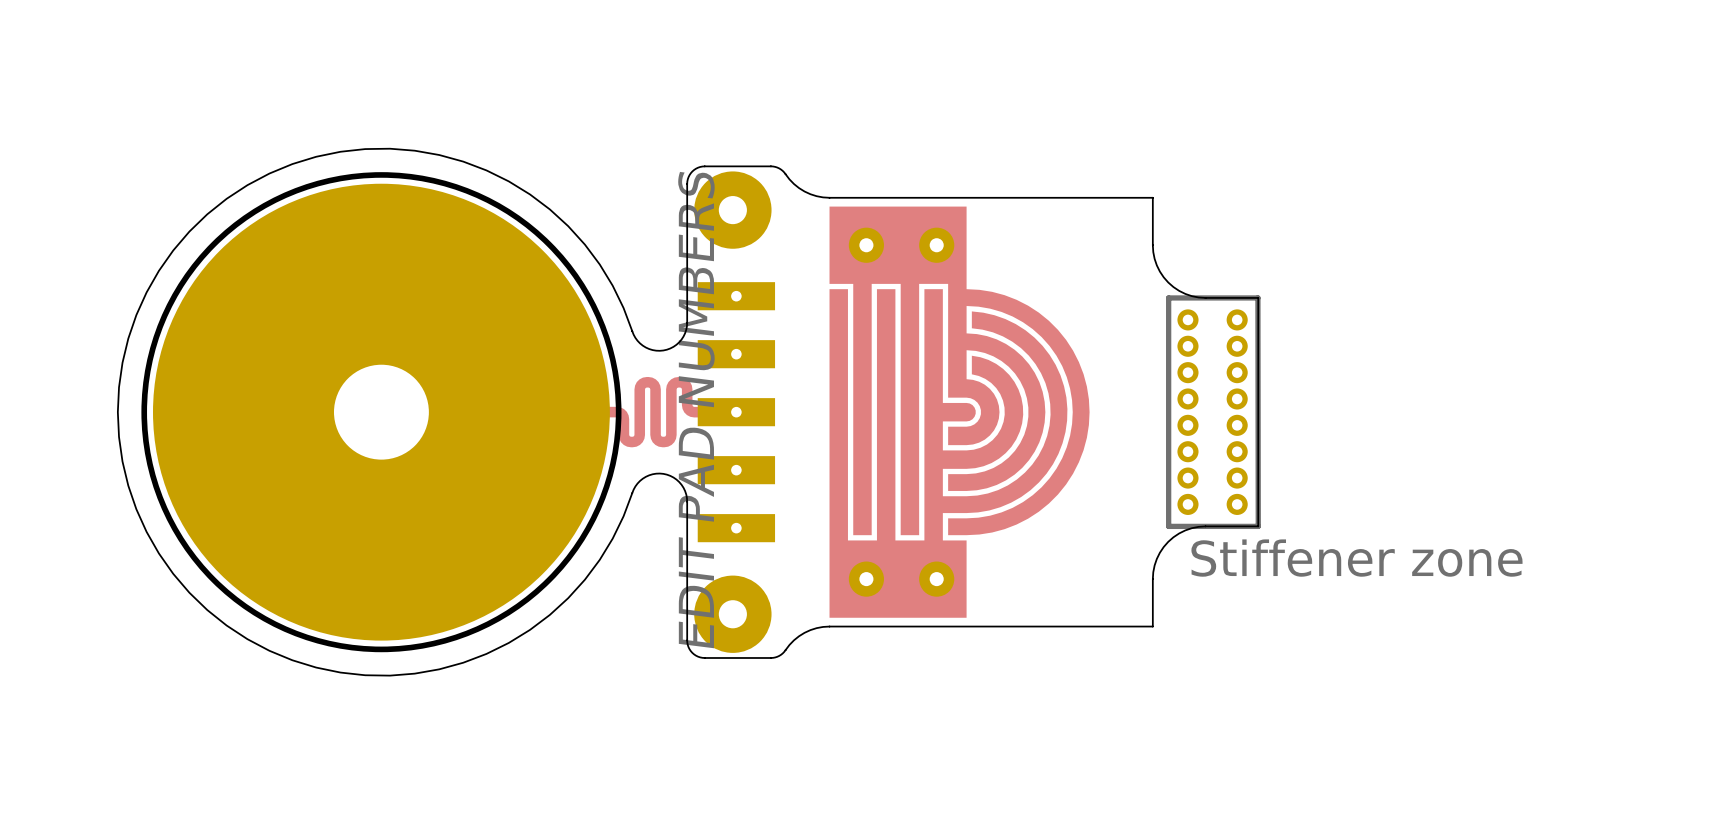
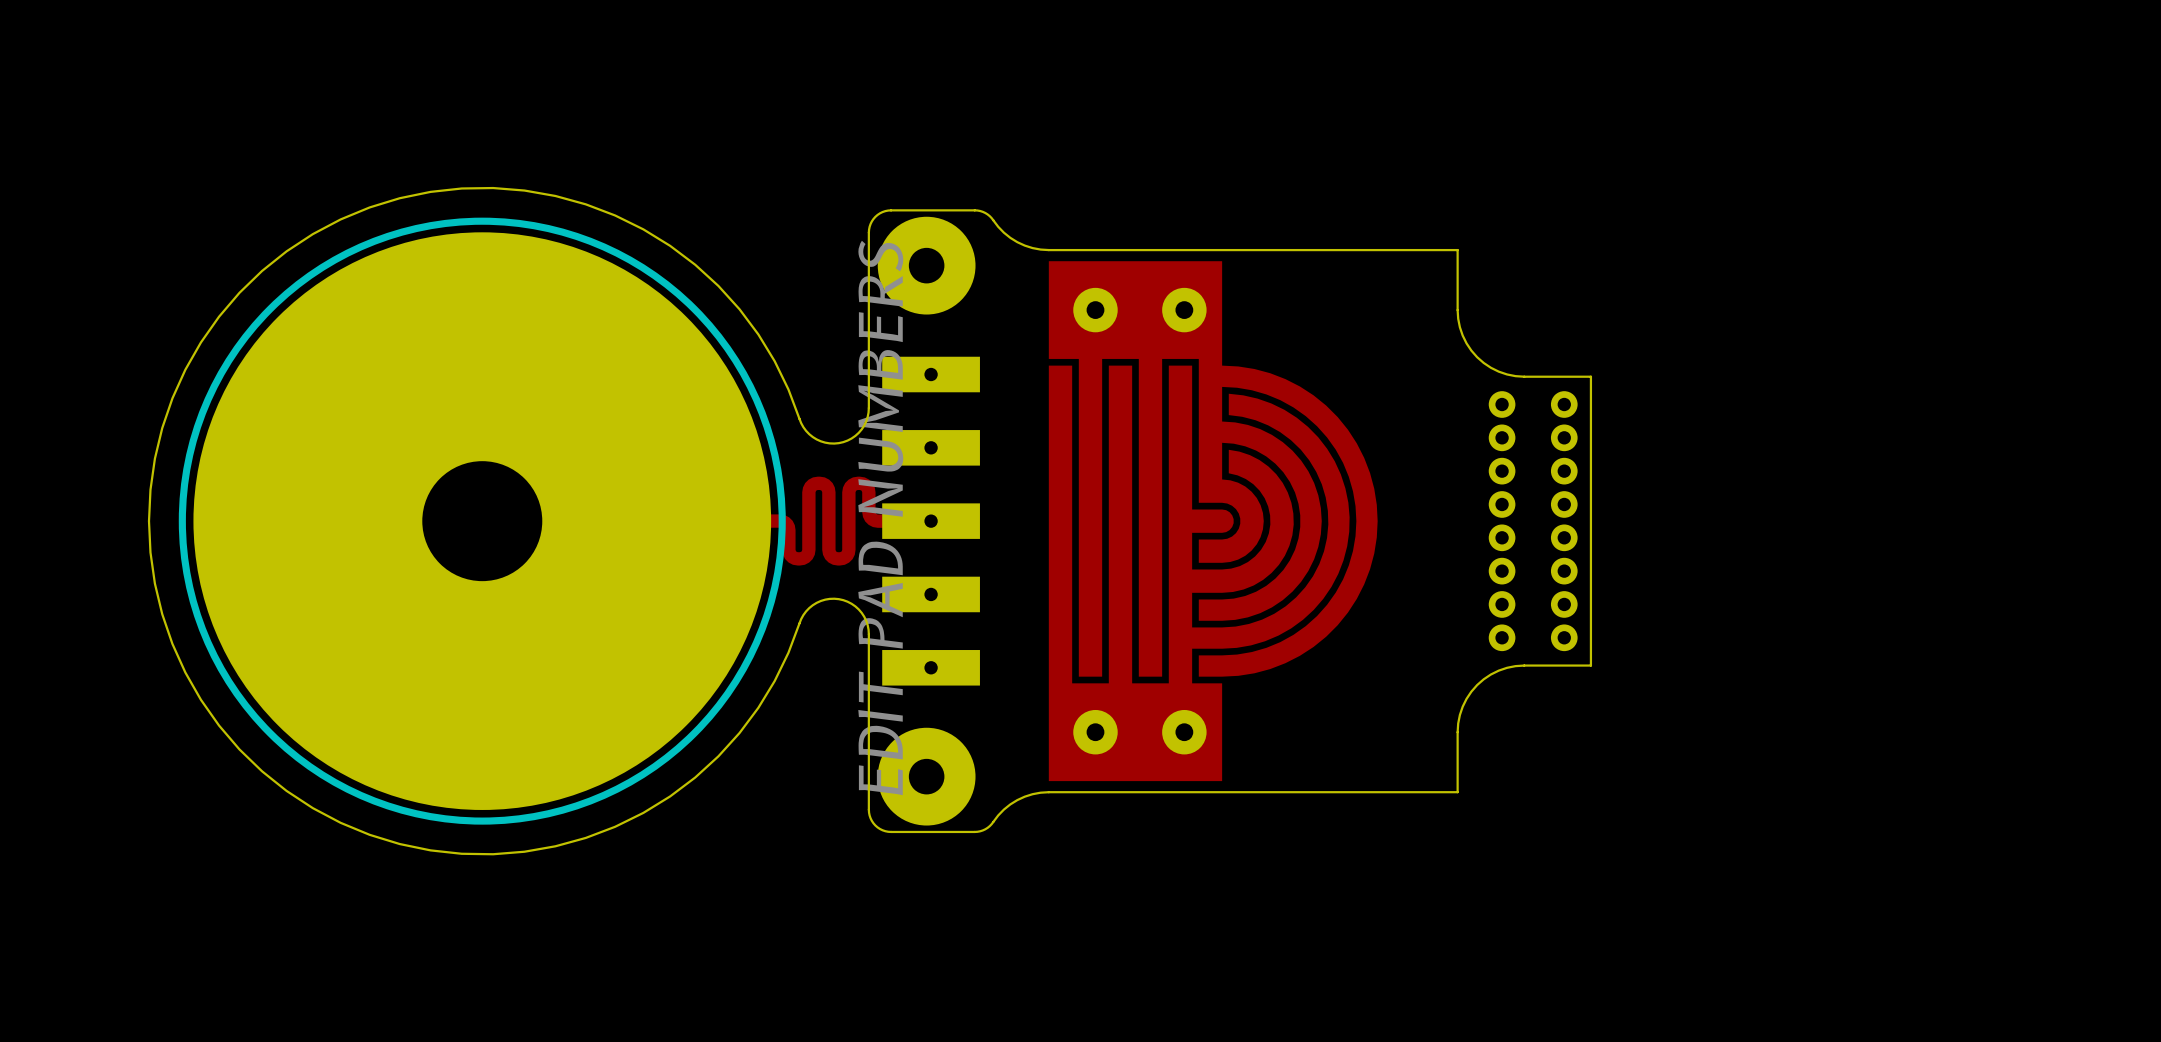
line: (1168, 297) (1168, 526) (1258, 526) (1257, 297) (1168, 297) -> none
text: Stiffener zone (1356, 558) -> none

